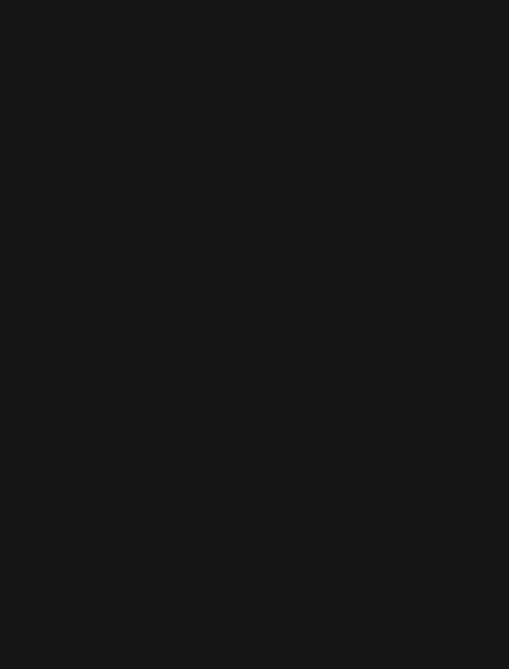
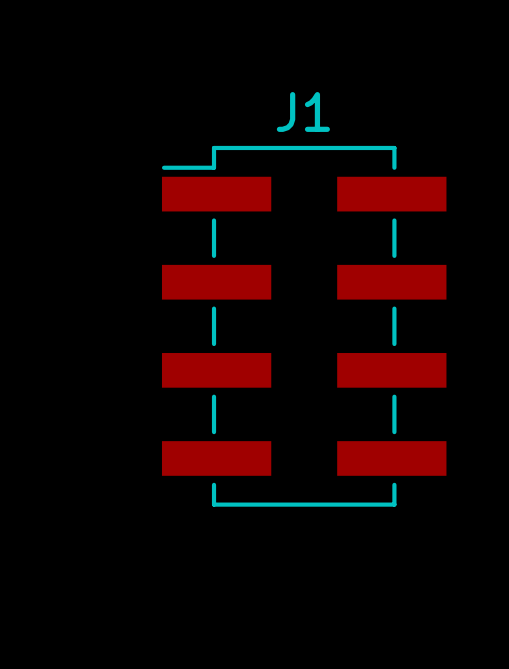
J1: none -> (304, 326)

